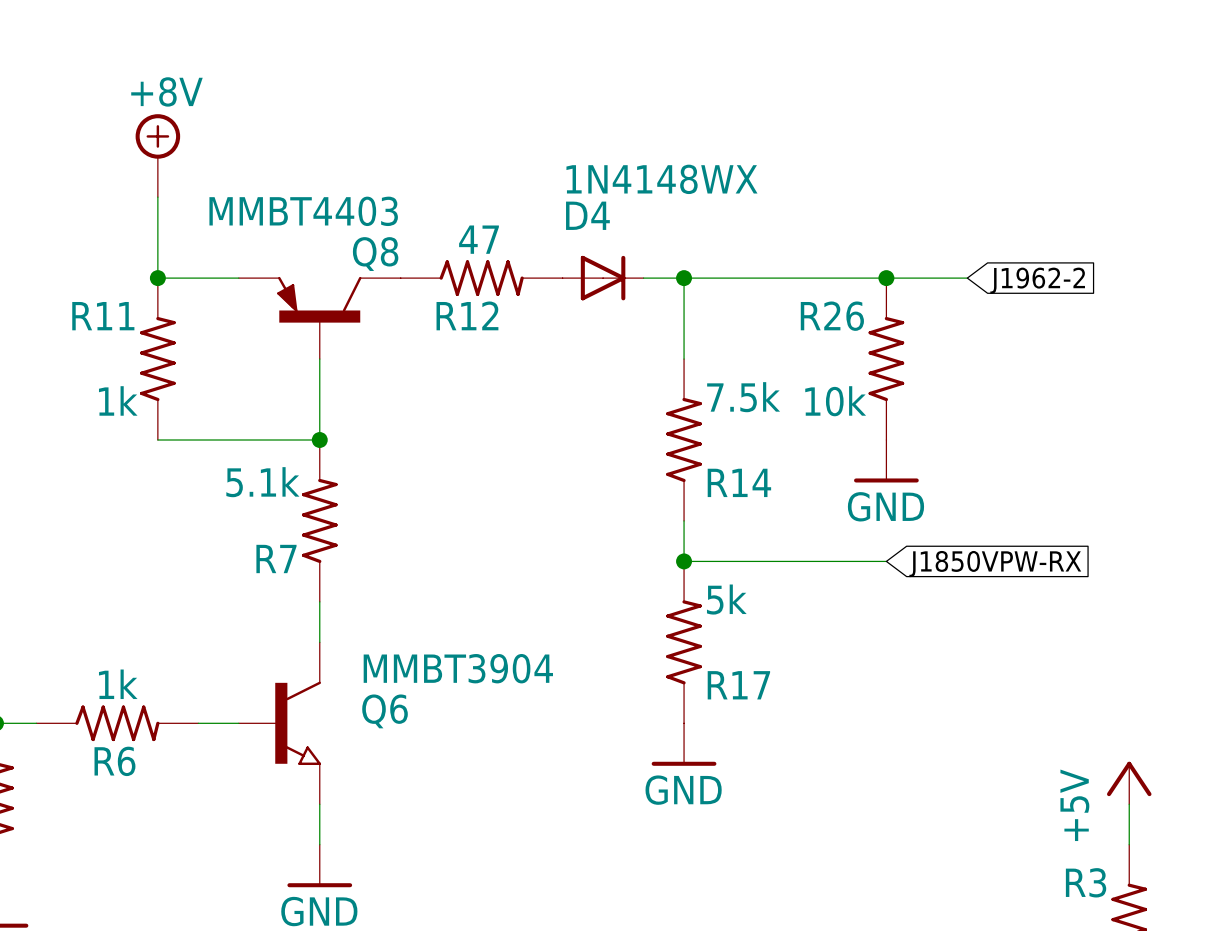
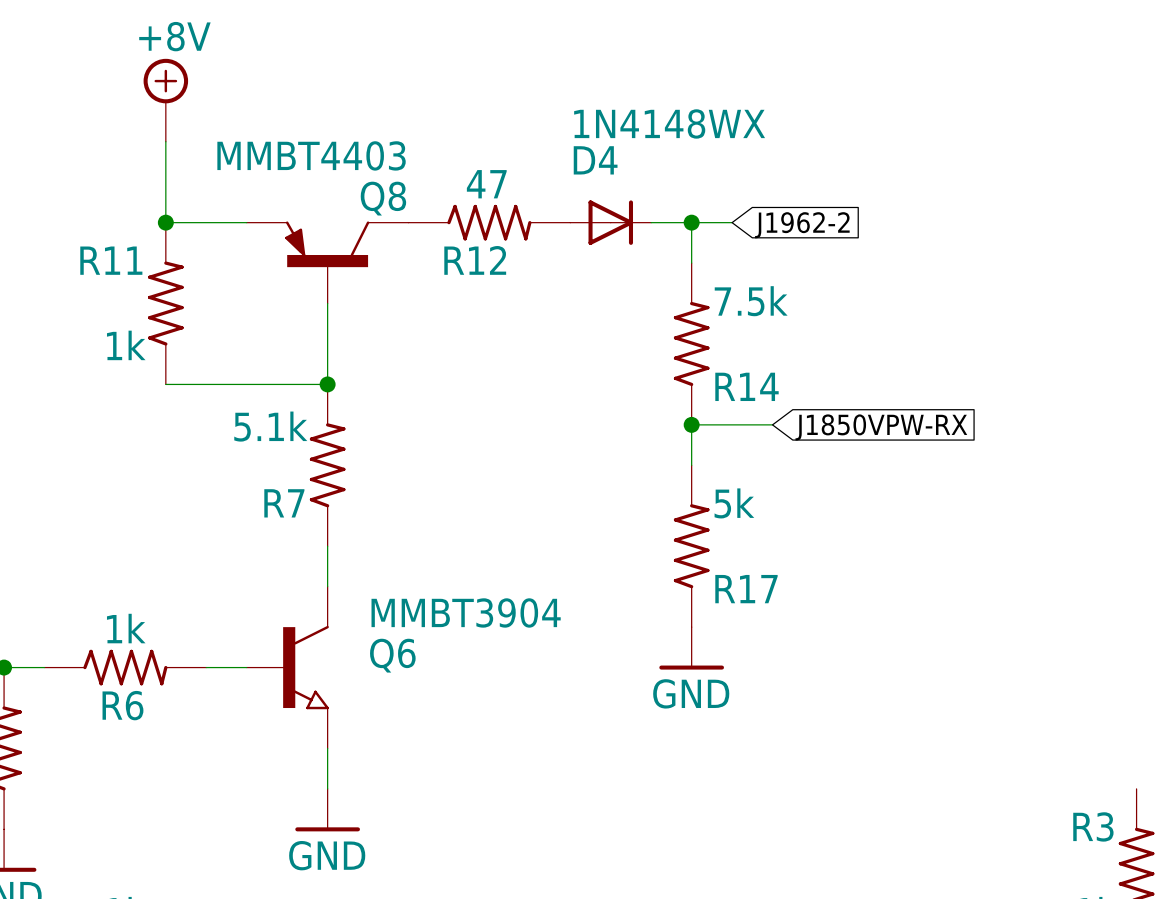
wire: (724, 278) (967, 278) -> none
junction: (886, 278) -> none
global label position: J1962-2 (1037, 280) -> J1962-2 (802, 225)
R26: 10k (886, 359) -> none
R14 position: (684, 440) -> (691, 343)
power symbol: GND (886, 461) -> none
wire: (684, 520) (684, 561) (886, 561) -> (691, 465) (691, 424) (772, 424)
junction position: (684, 561) -> (691, 424)
global label position: J1850VPW-RX (995, 564) -> J1850VPW-RX (881, 427)
R17 position: (684, 642) -> (691, 546)
power symbol position: GND (684, 744) -> GND (691, 648)
power symbol: +5V (1129, 783) -> none
wire: (1129, 804) (1129, 844) -> none

